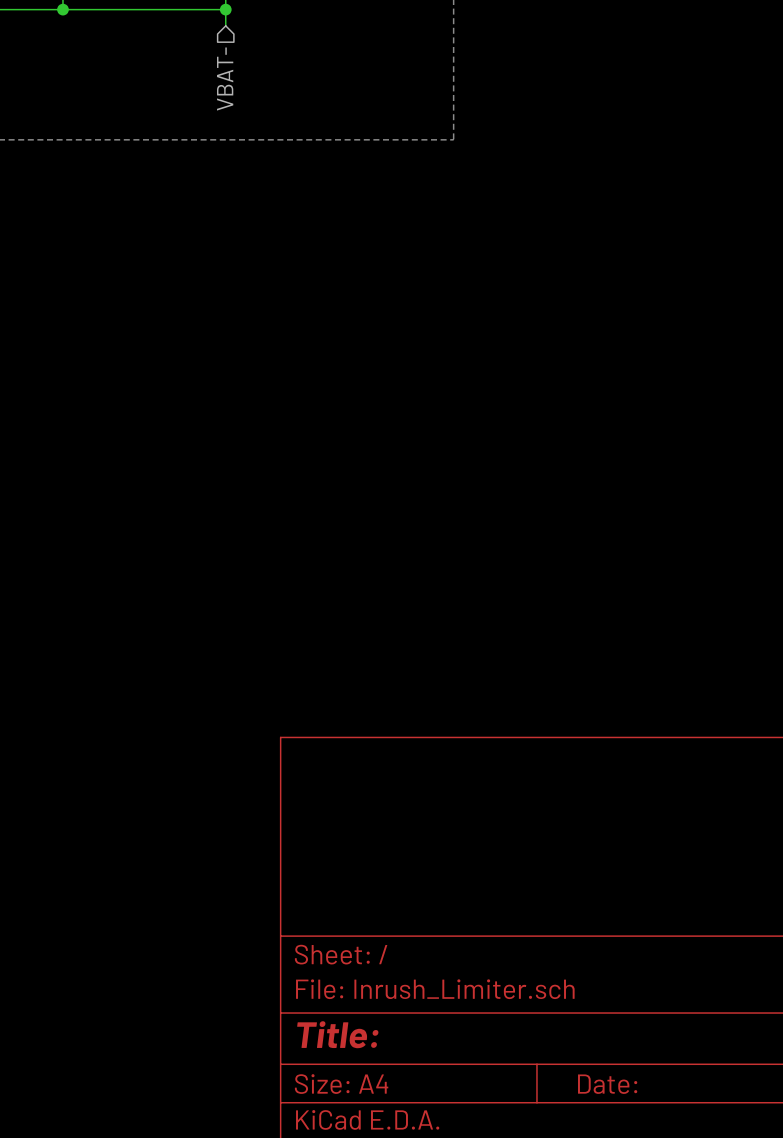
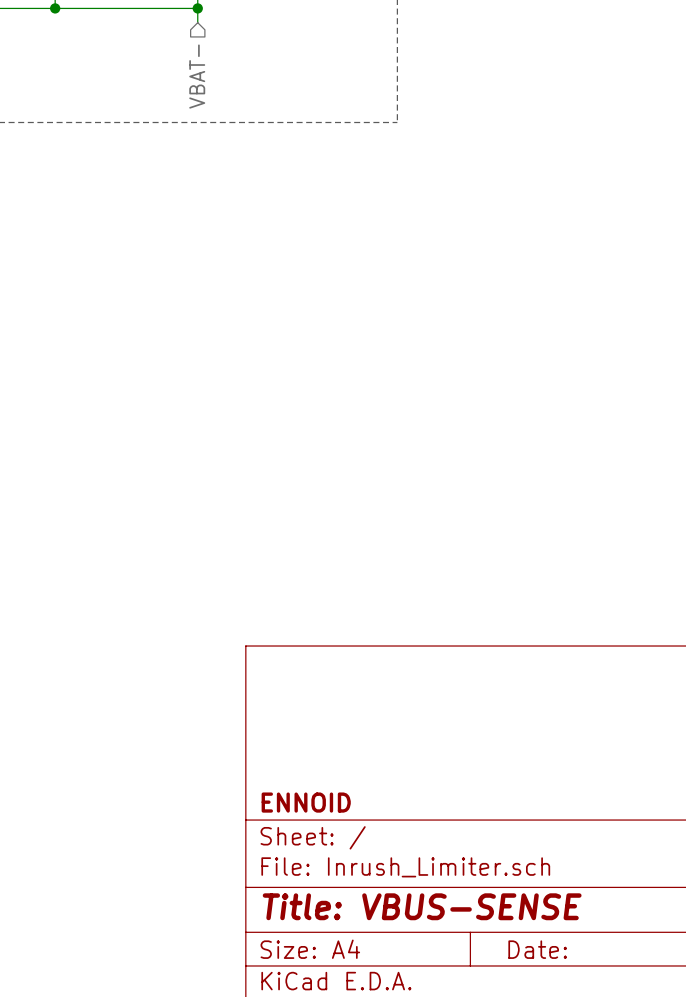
title block: none -> ENNOID (306, 802)
title block: Title: (337, 1034) -> Title: VBUS-SENSE (422, 906)

